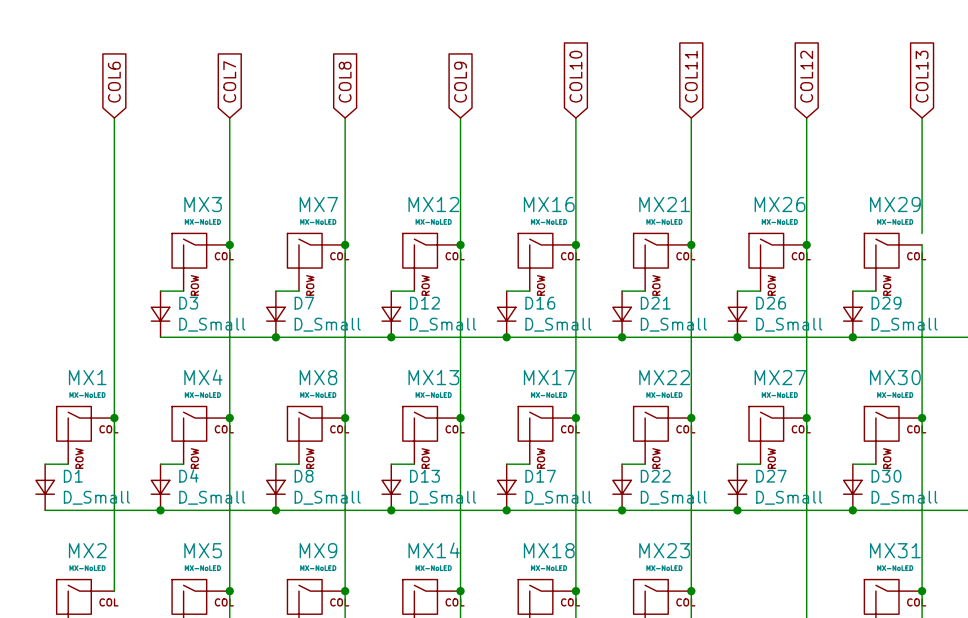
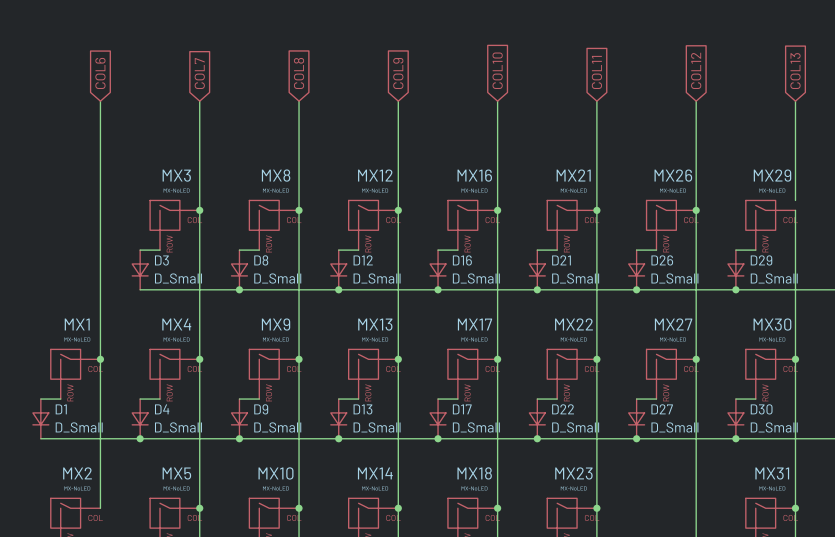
MX7 name: MX7 (318, 204) -> MX8 (276, 175)
D7 name: D7 (304, 303) -> D8 (261, 260)
MX8 name: MX8 (318, 377) -> MX9 (276, 324)
D8 name: D8 (304, 476) -> D9 (261, 409)
MX9 name: MX9 (318, 550) -> MX10 (275, 473)

